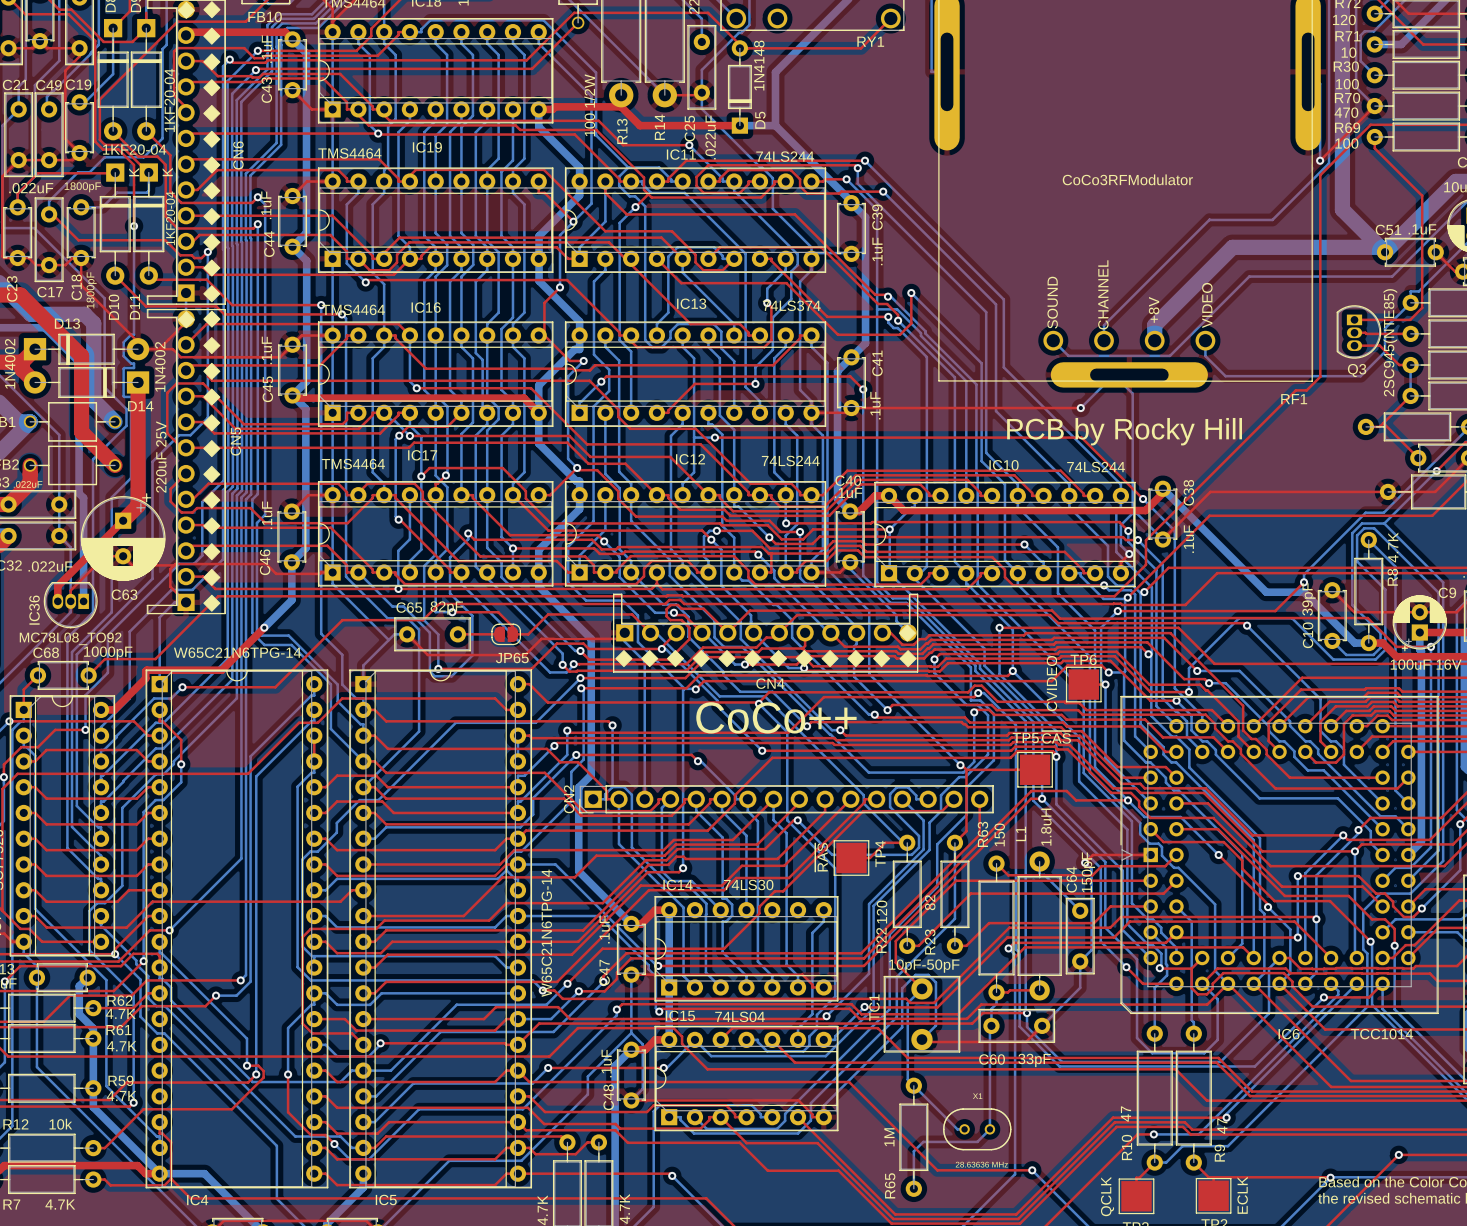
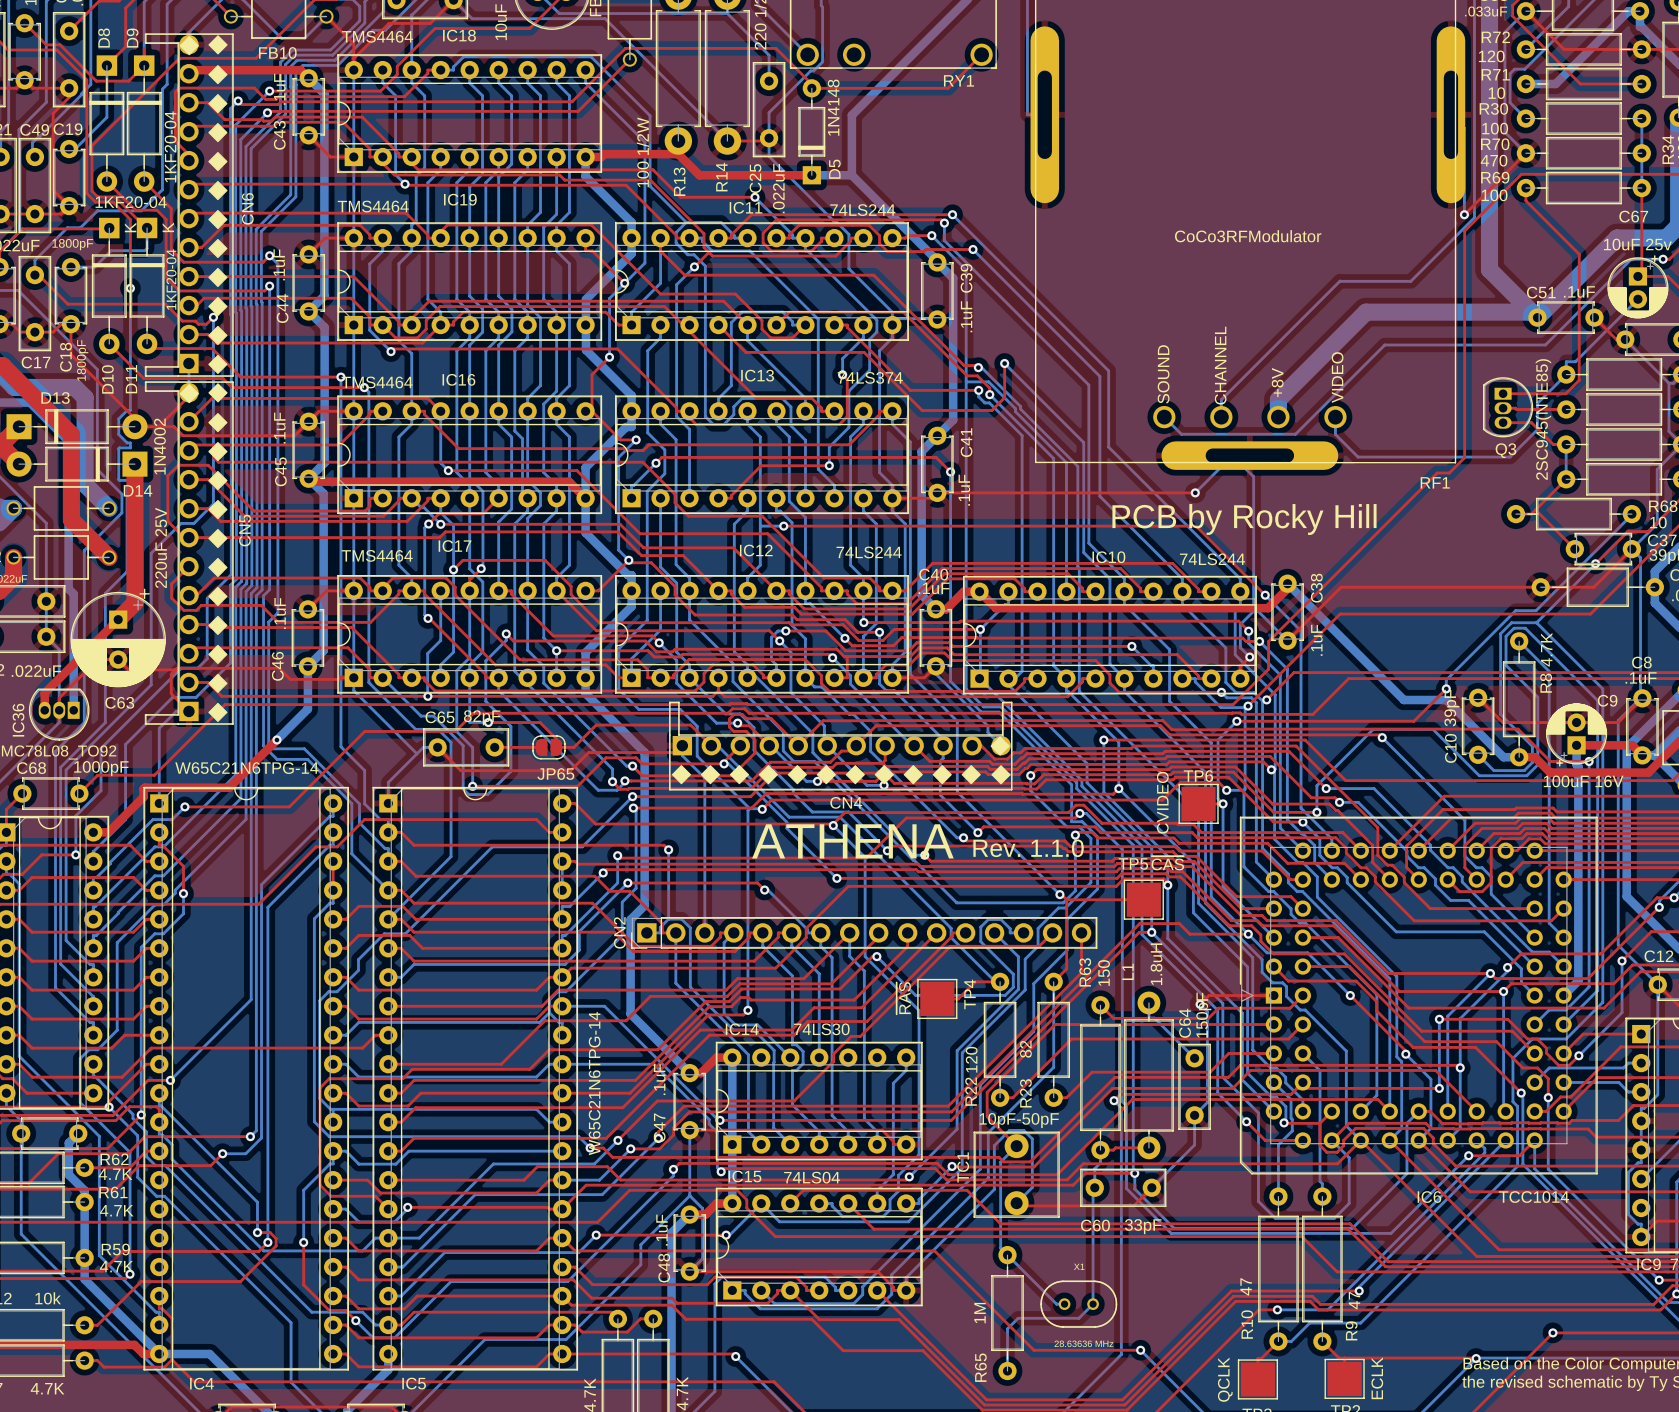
text: CoCo++ (776, 717) -> ATHENA (852, 841)
text: none -> Rev. 1.1.0 (1028, 848)

